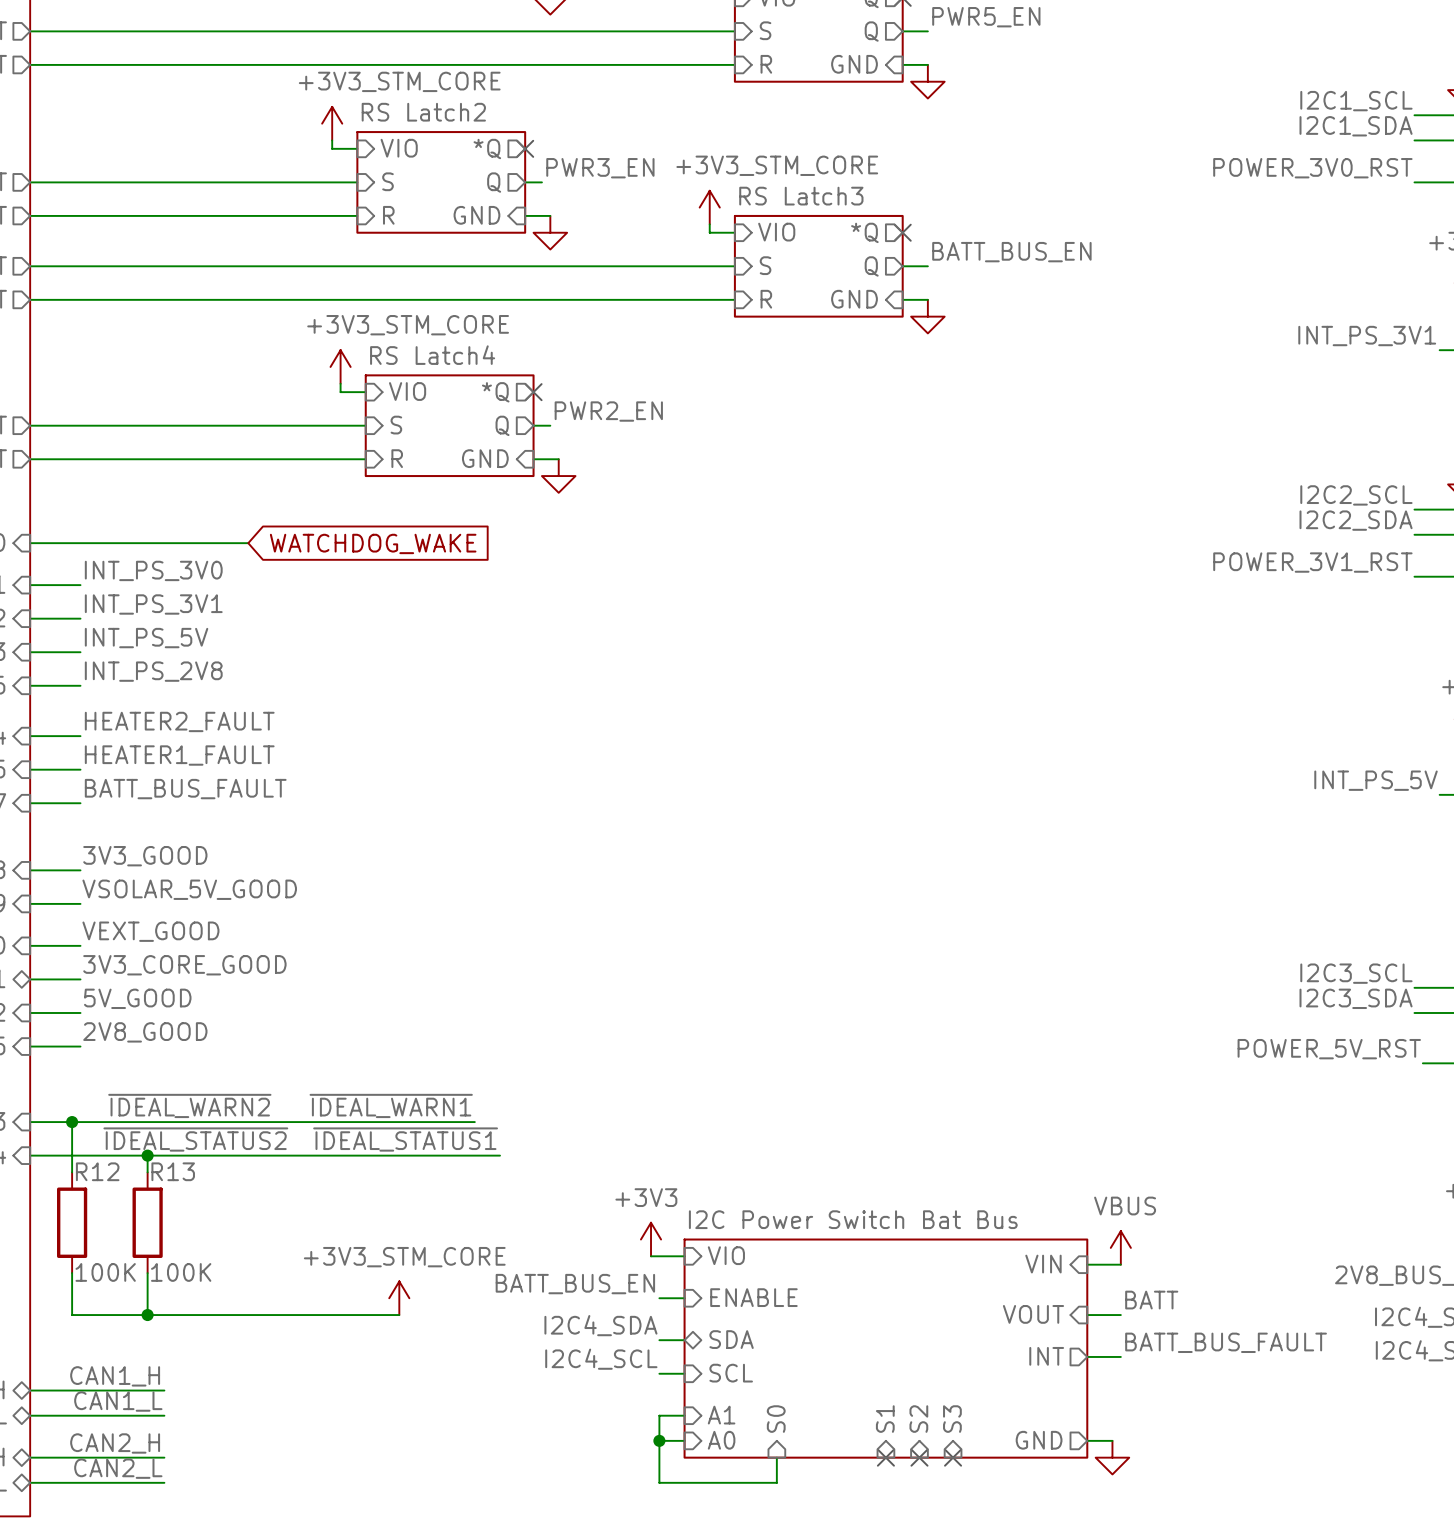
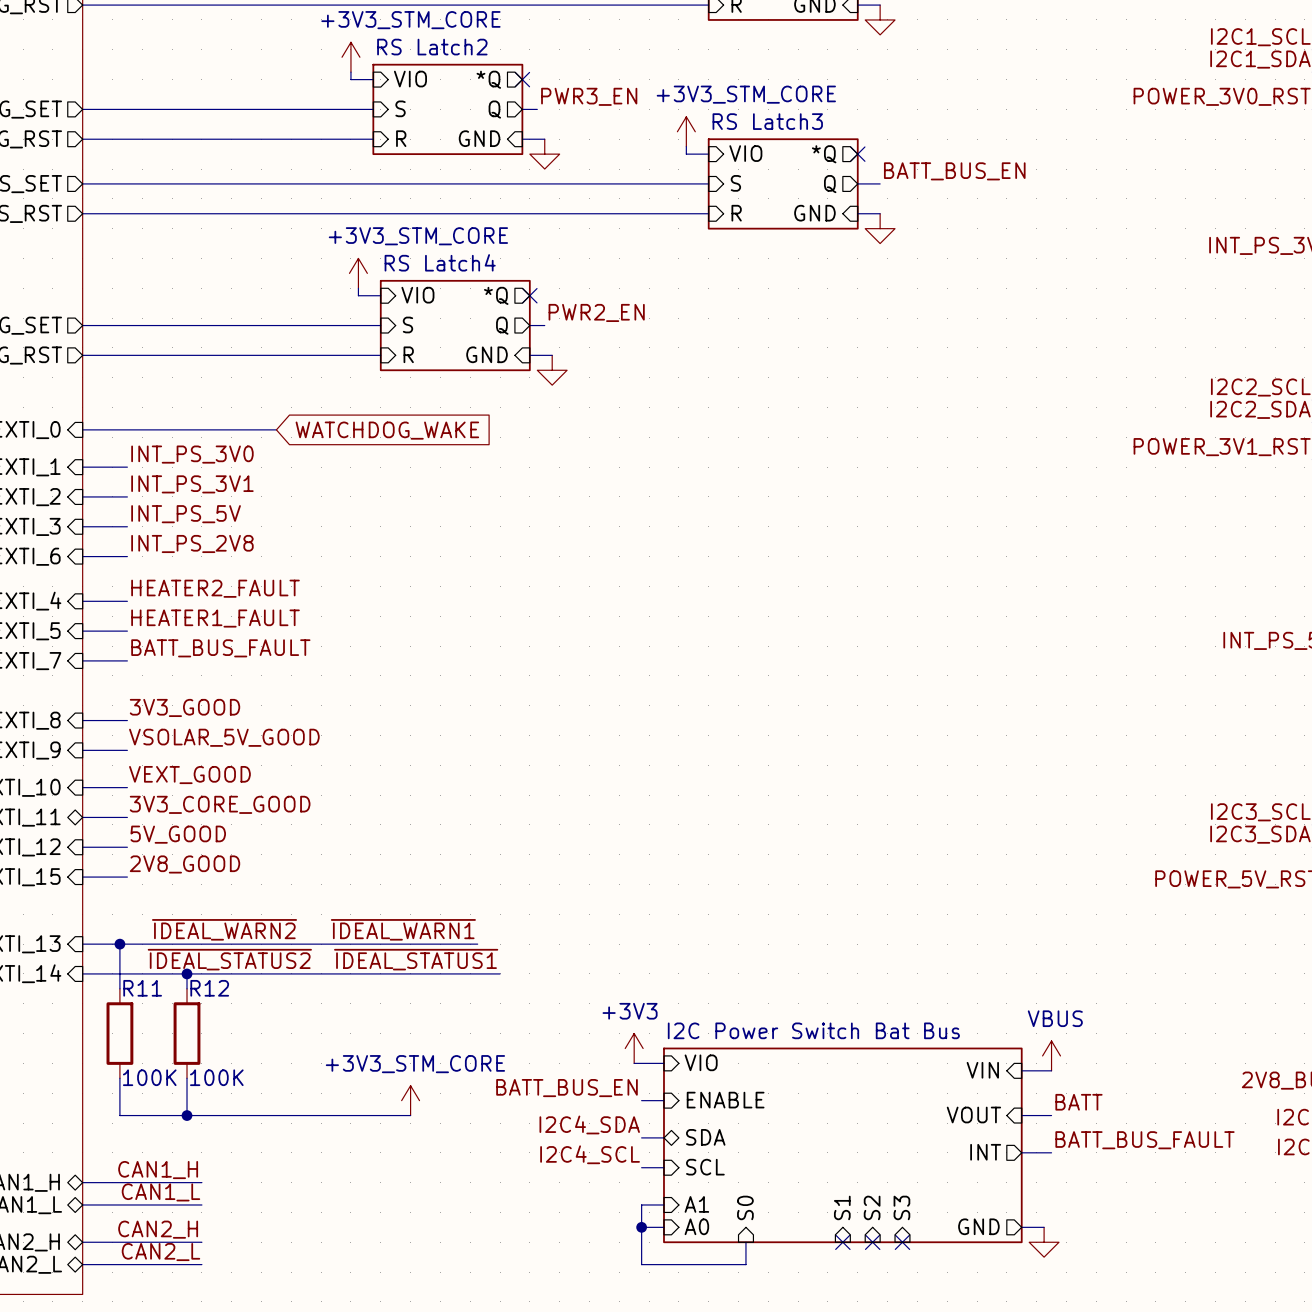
R12 name: R12 (97, 1171) -> R11 (142, 988)
R13 name: R13 (173, 1171) -> R12 (209, 988)

